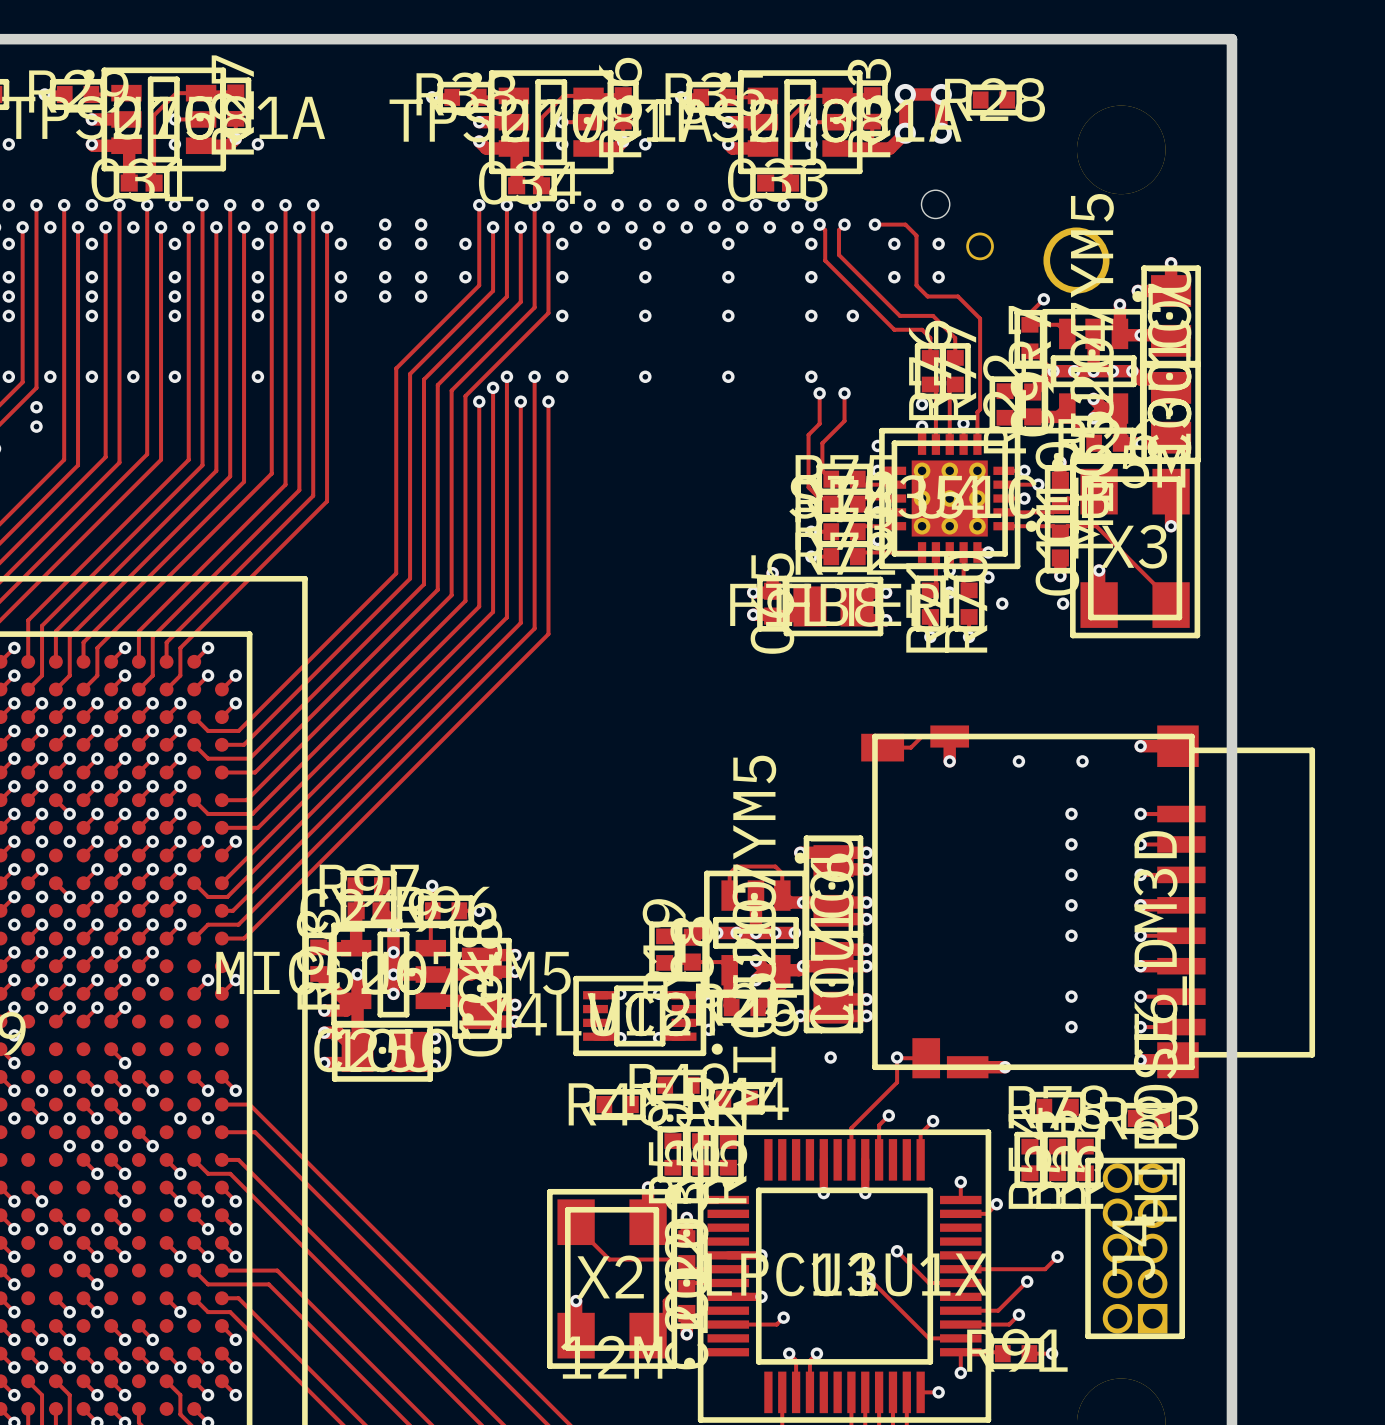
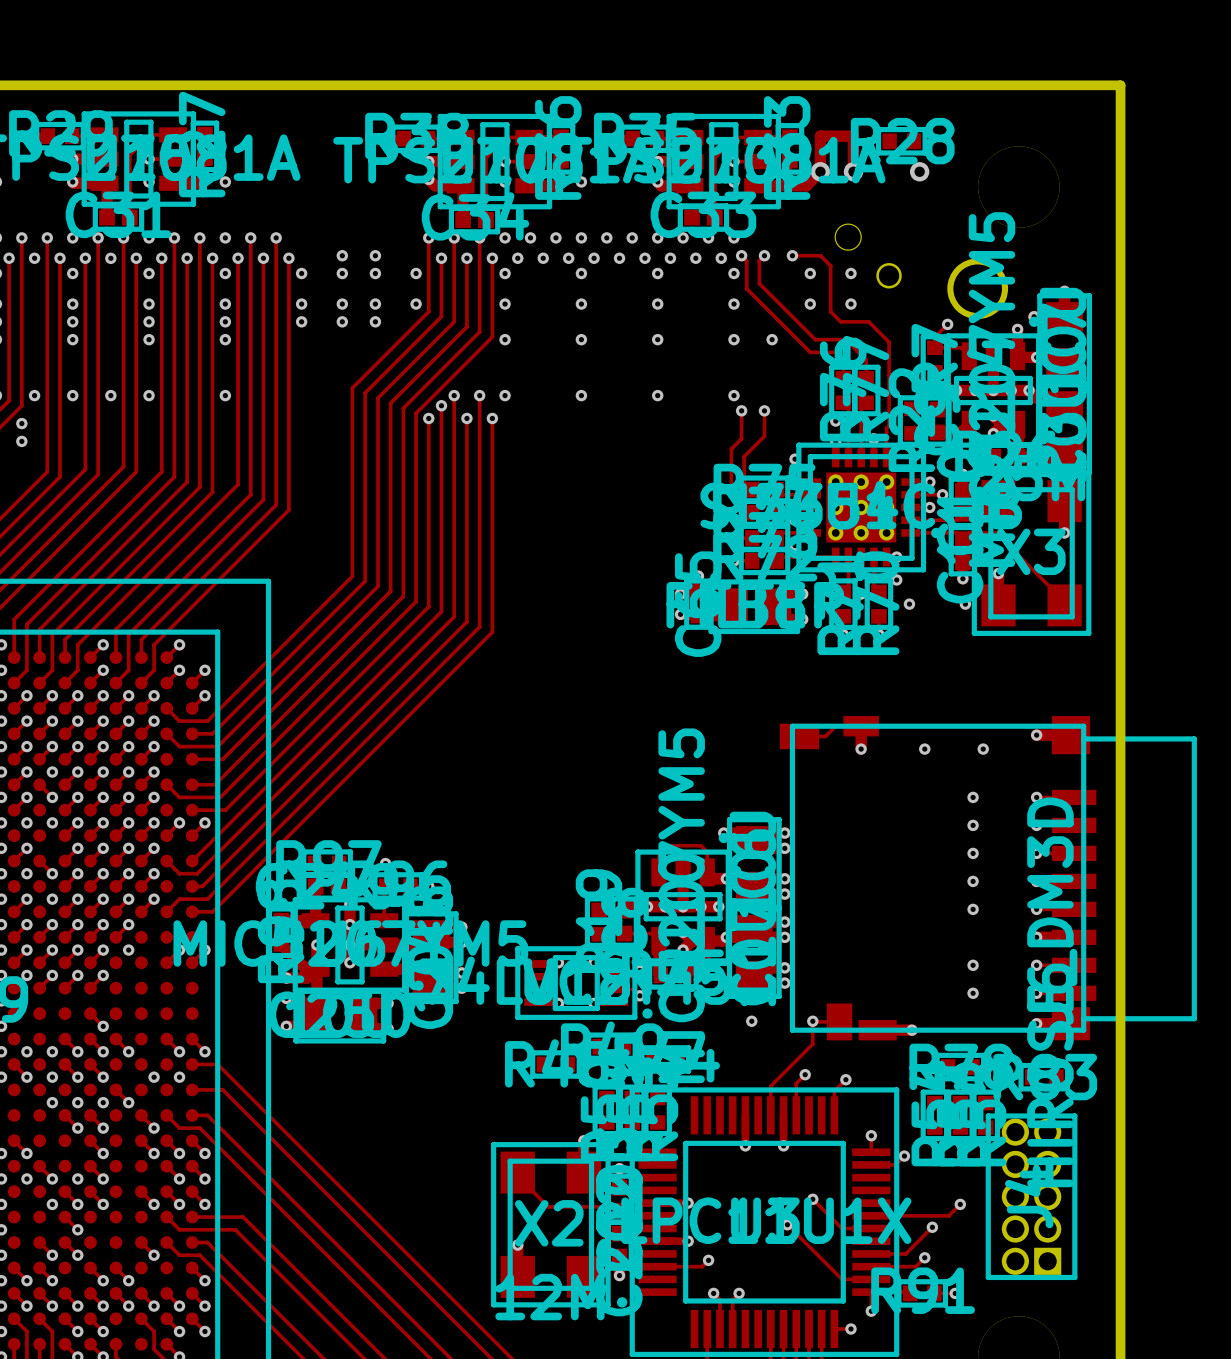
via: (905, 94) -> none
via: (941, 94) -> none
via: none -> (919, 171)

